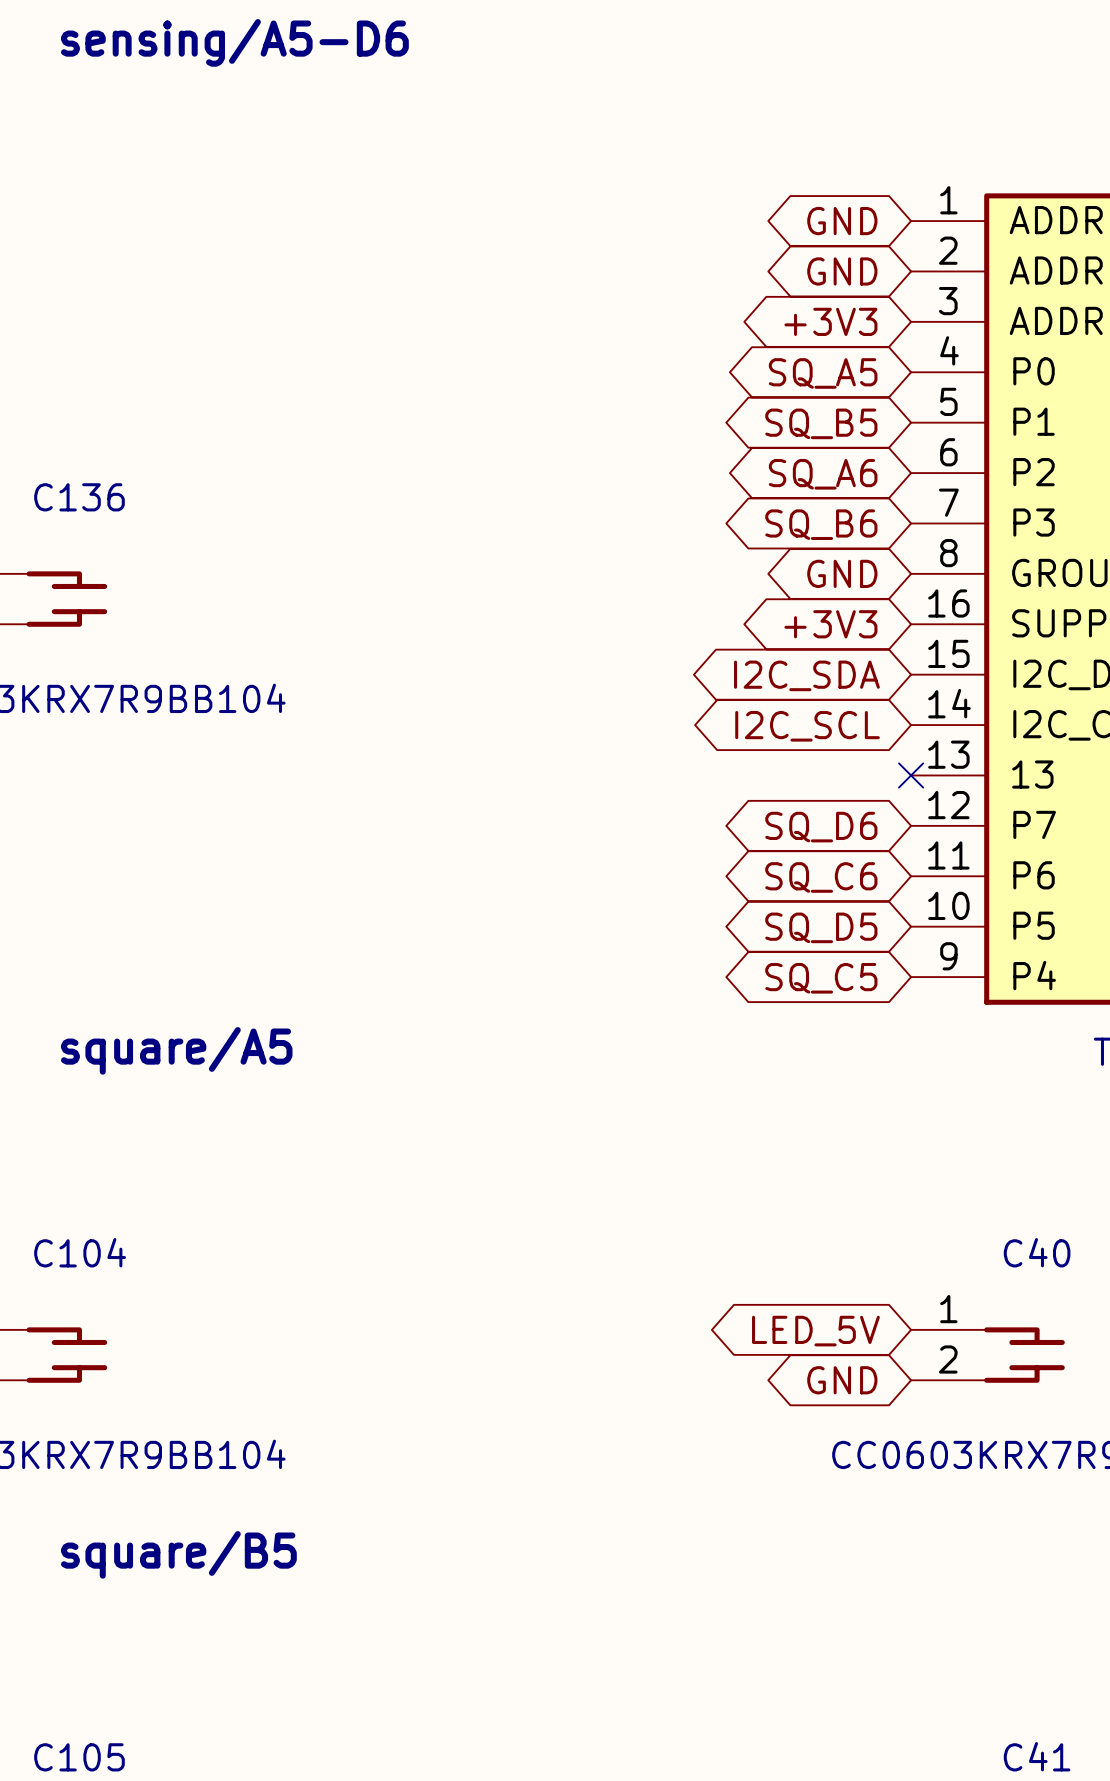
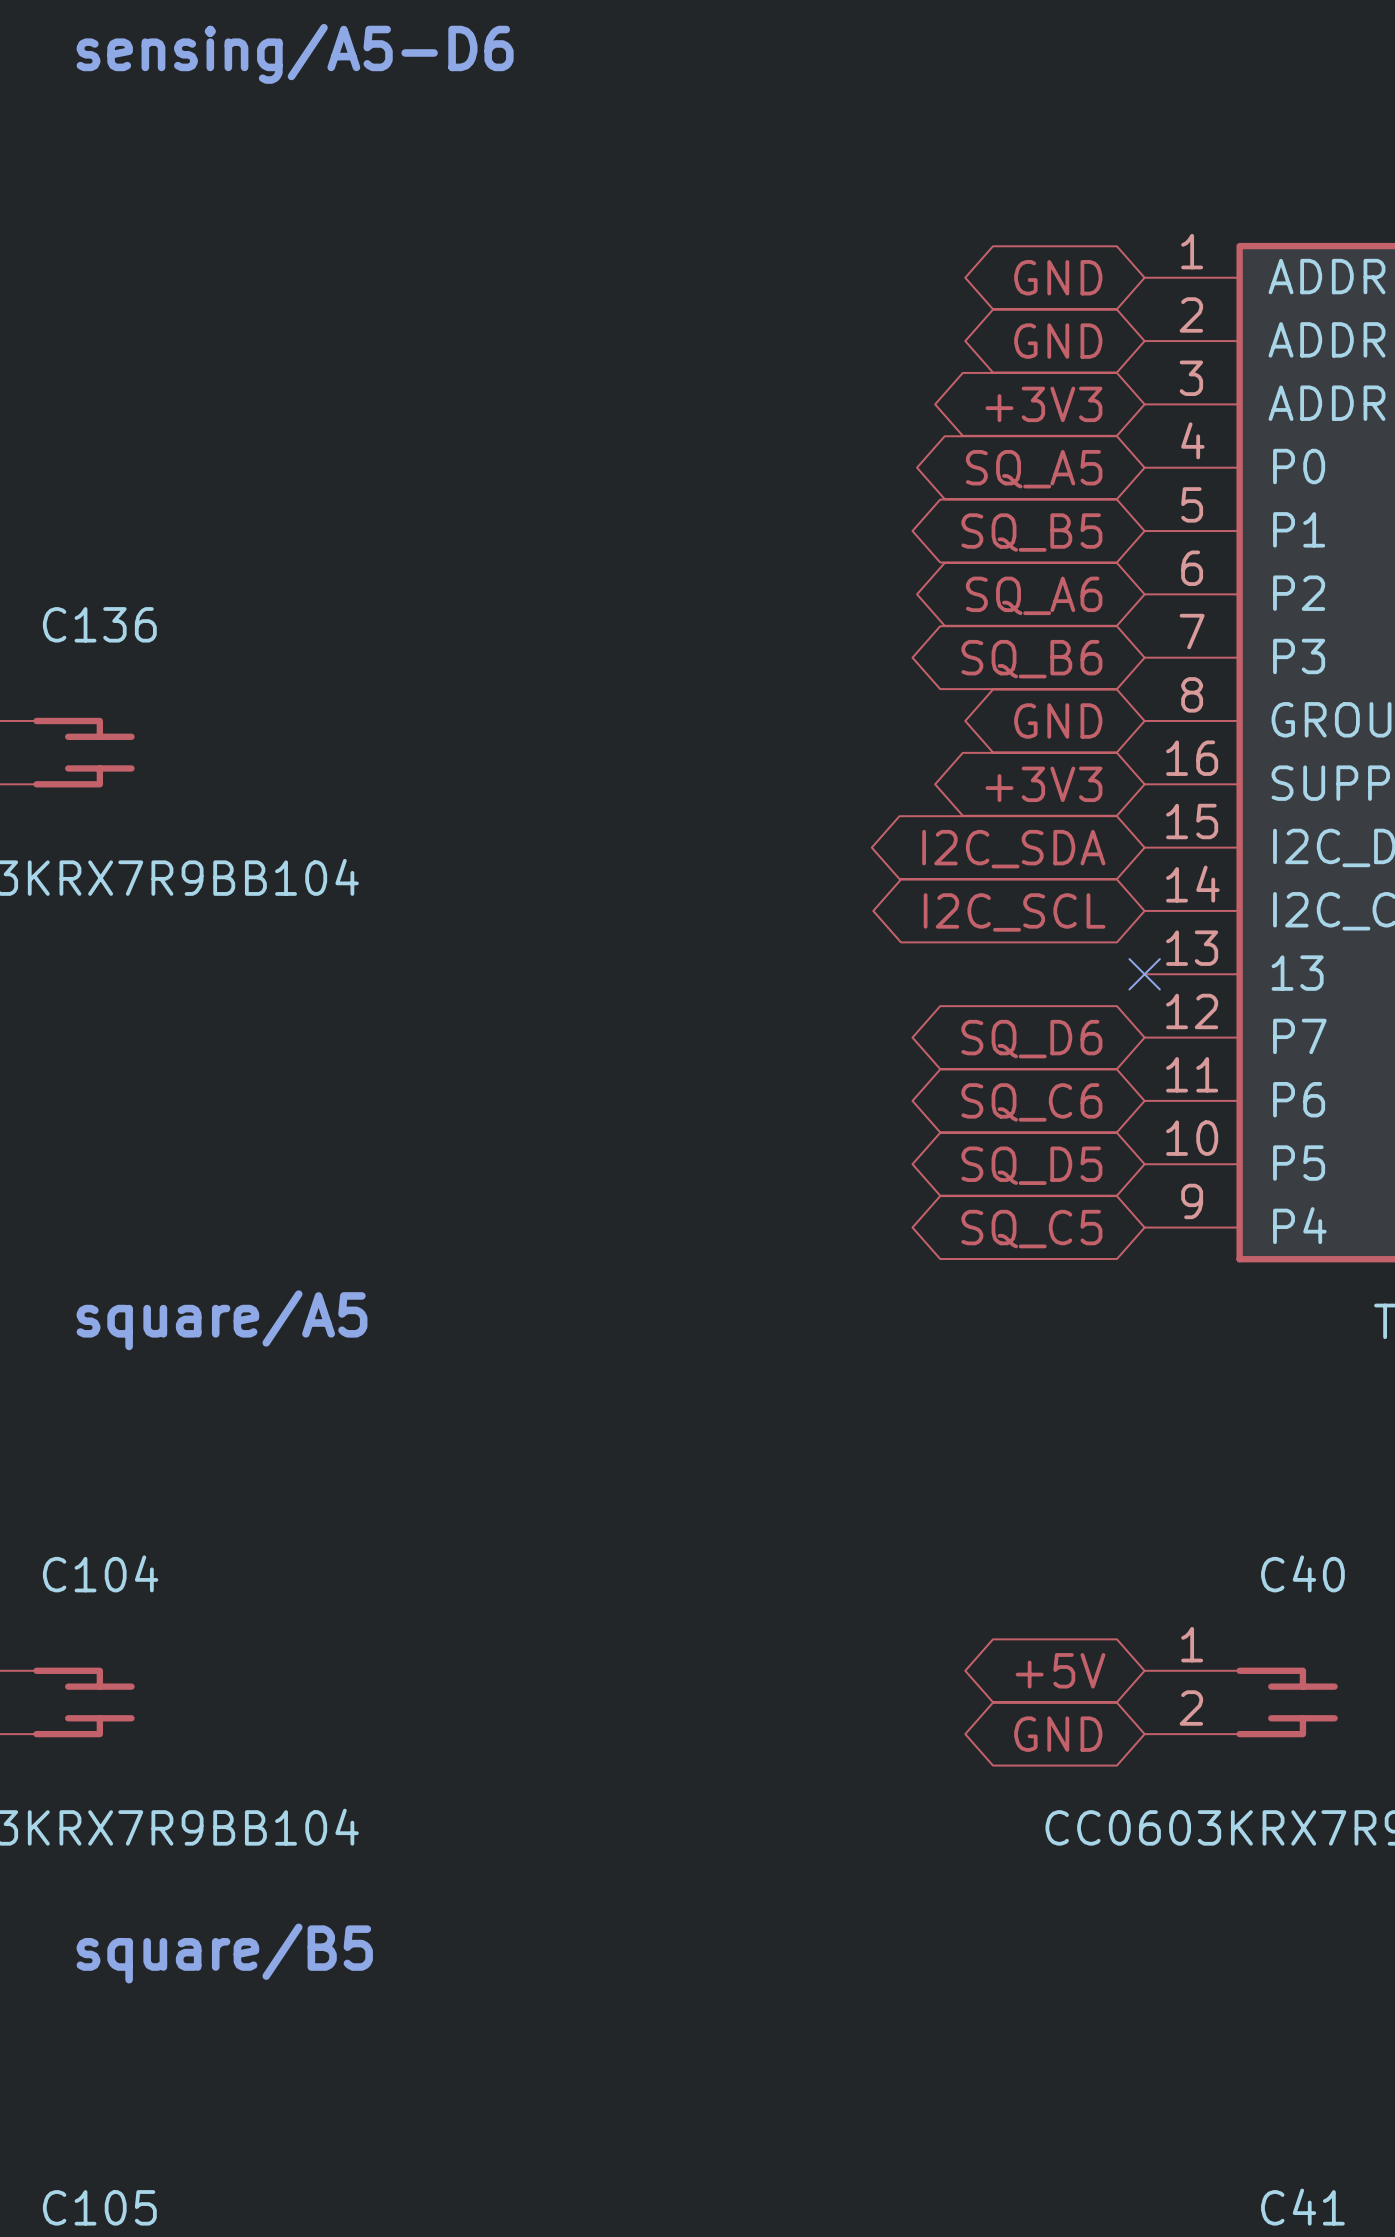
global label: LED_5V (815, 1331) -> +5V (1060, 1670)

